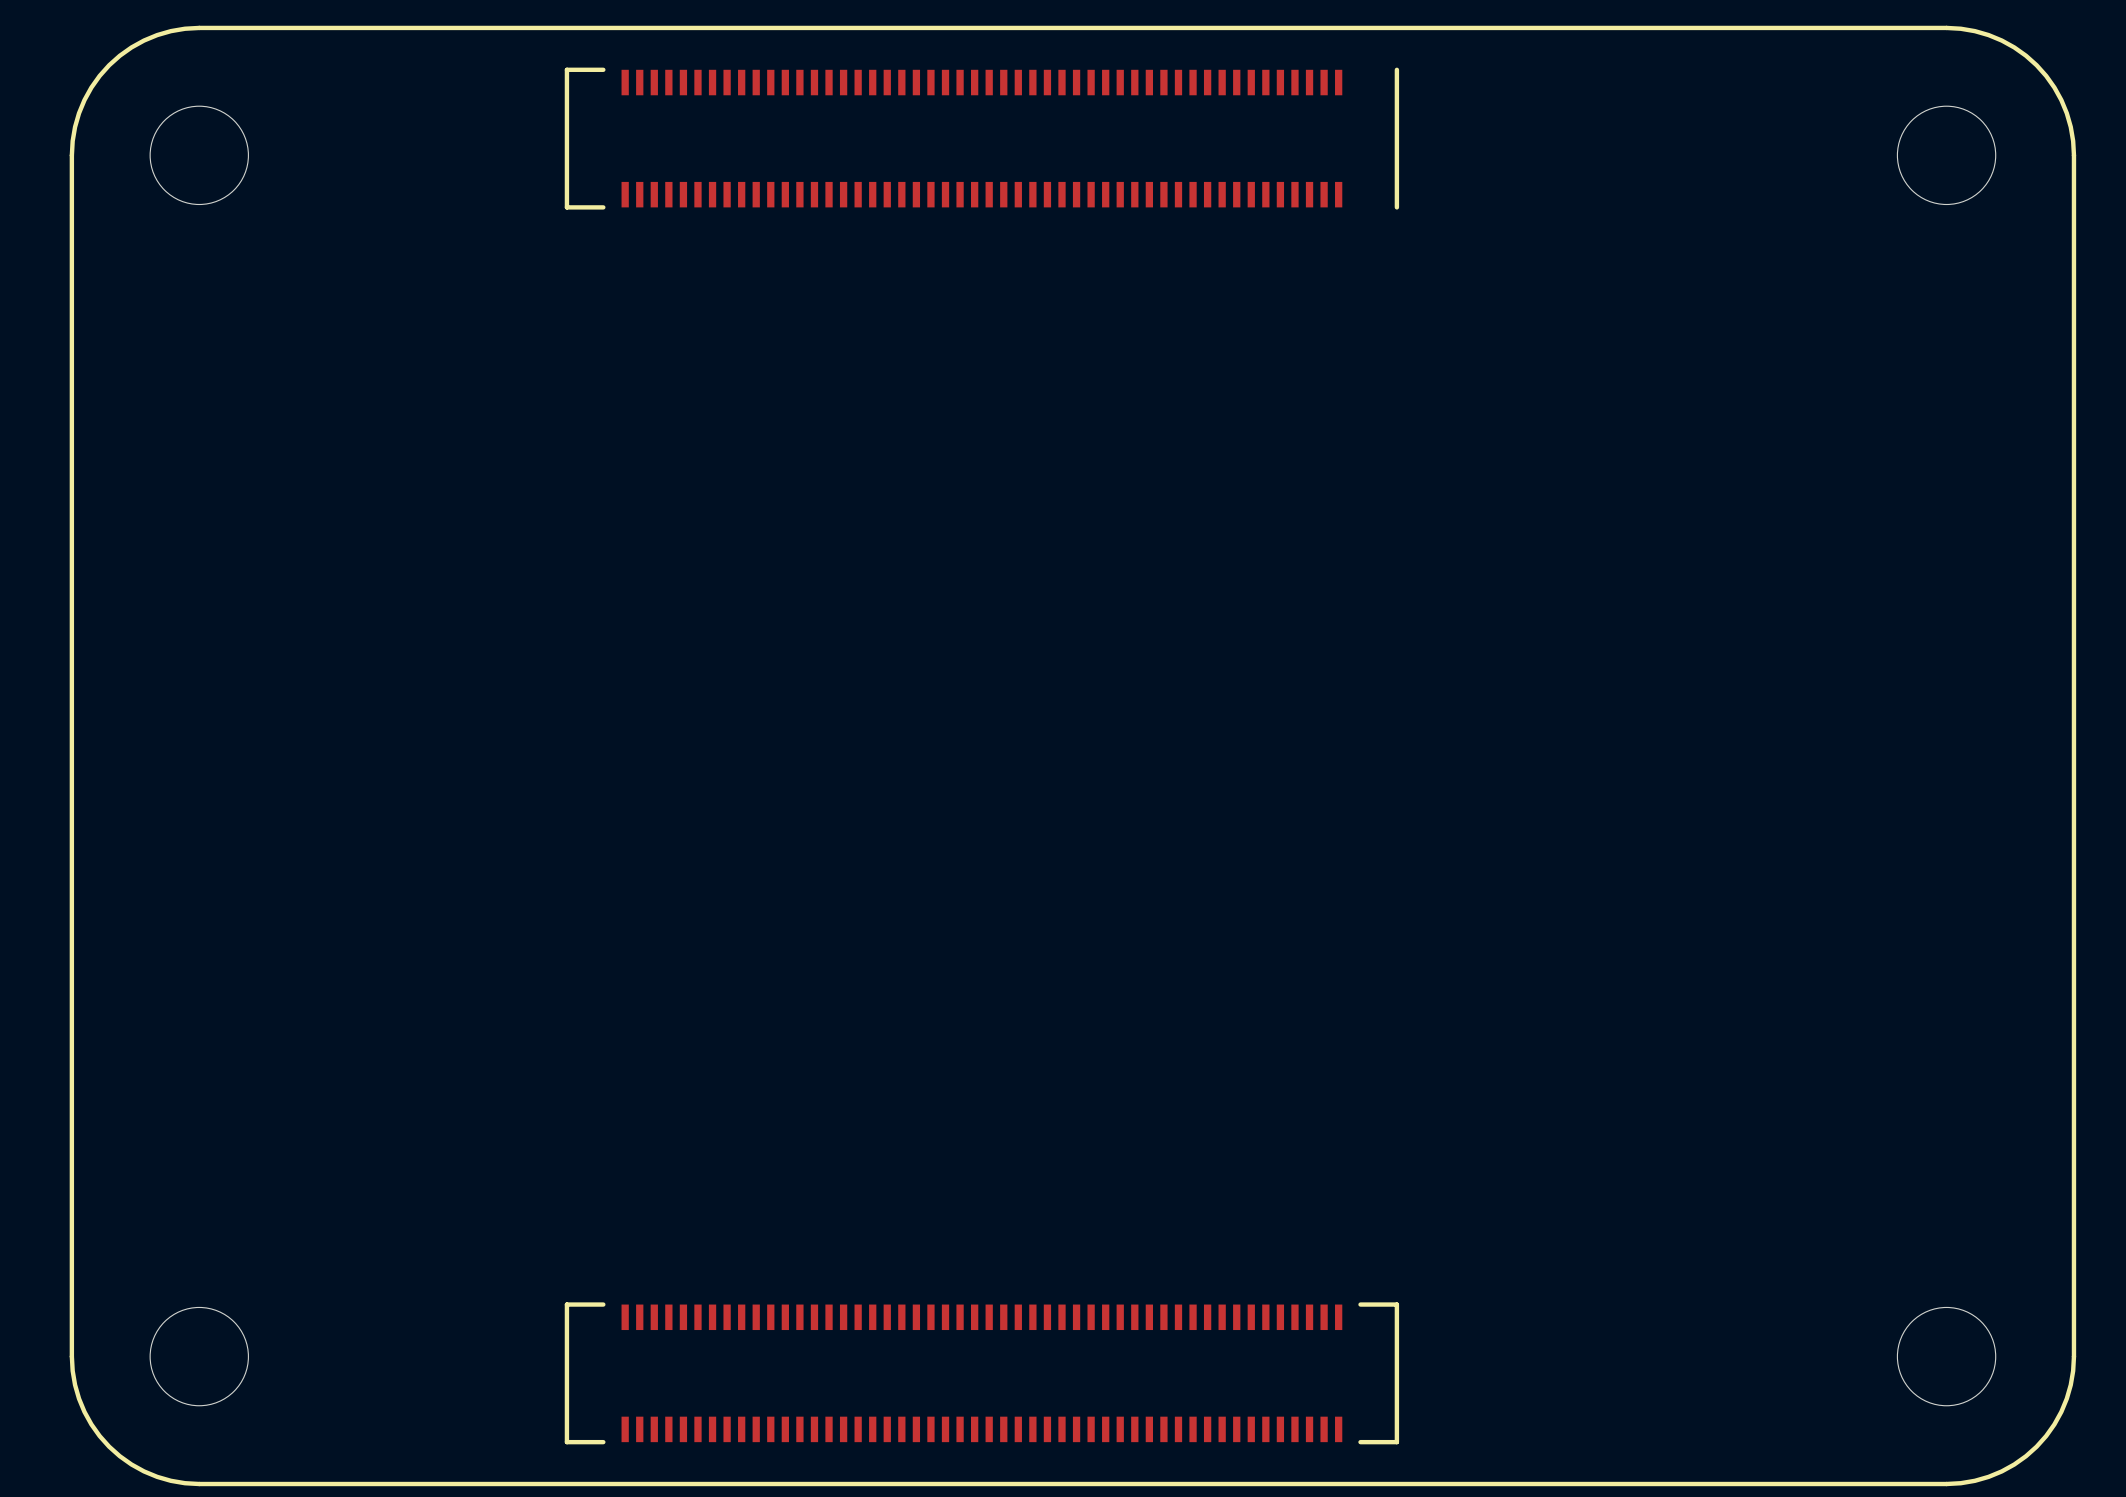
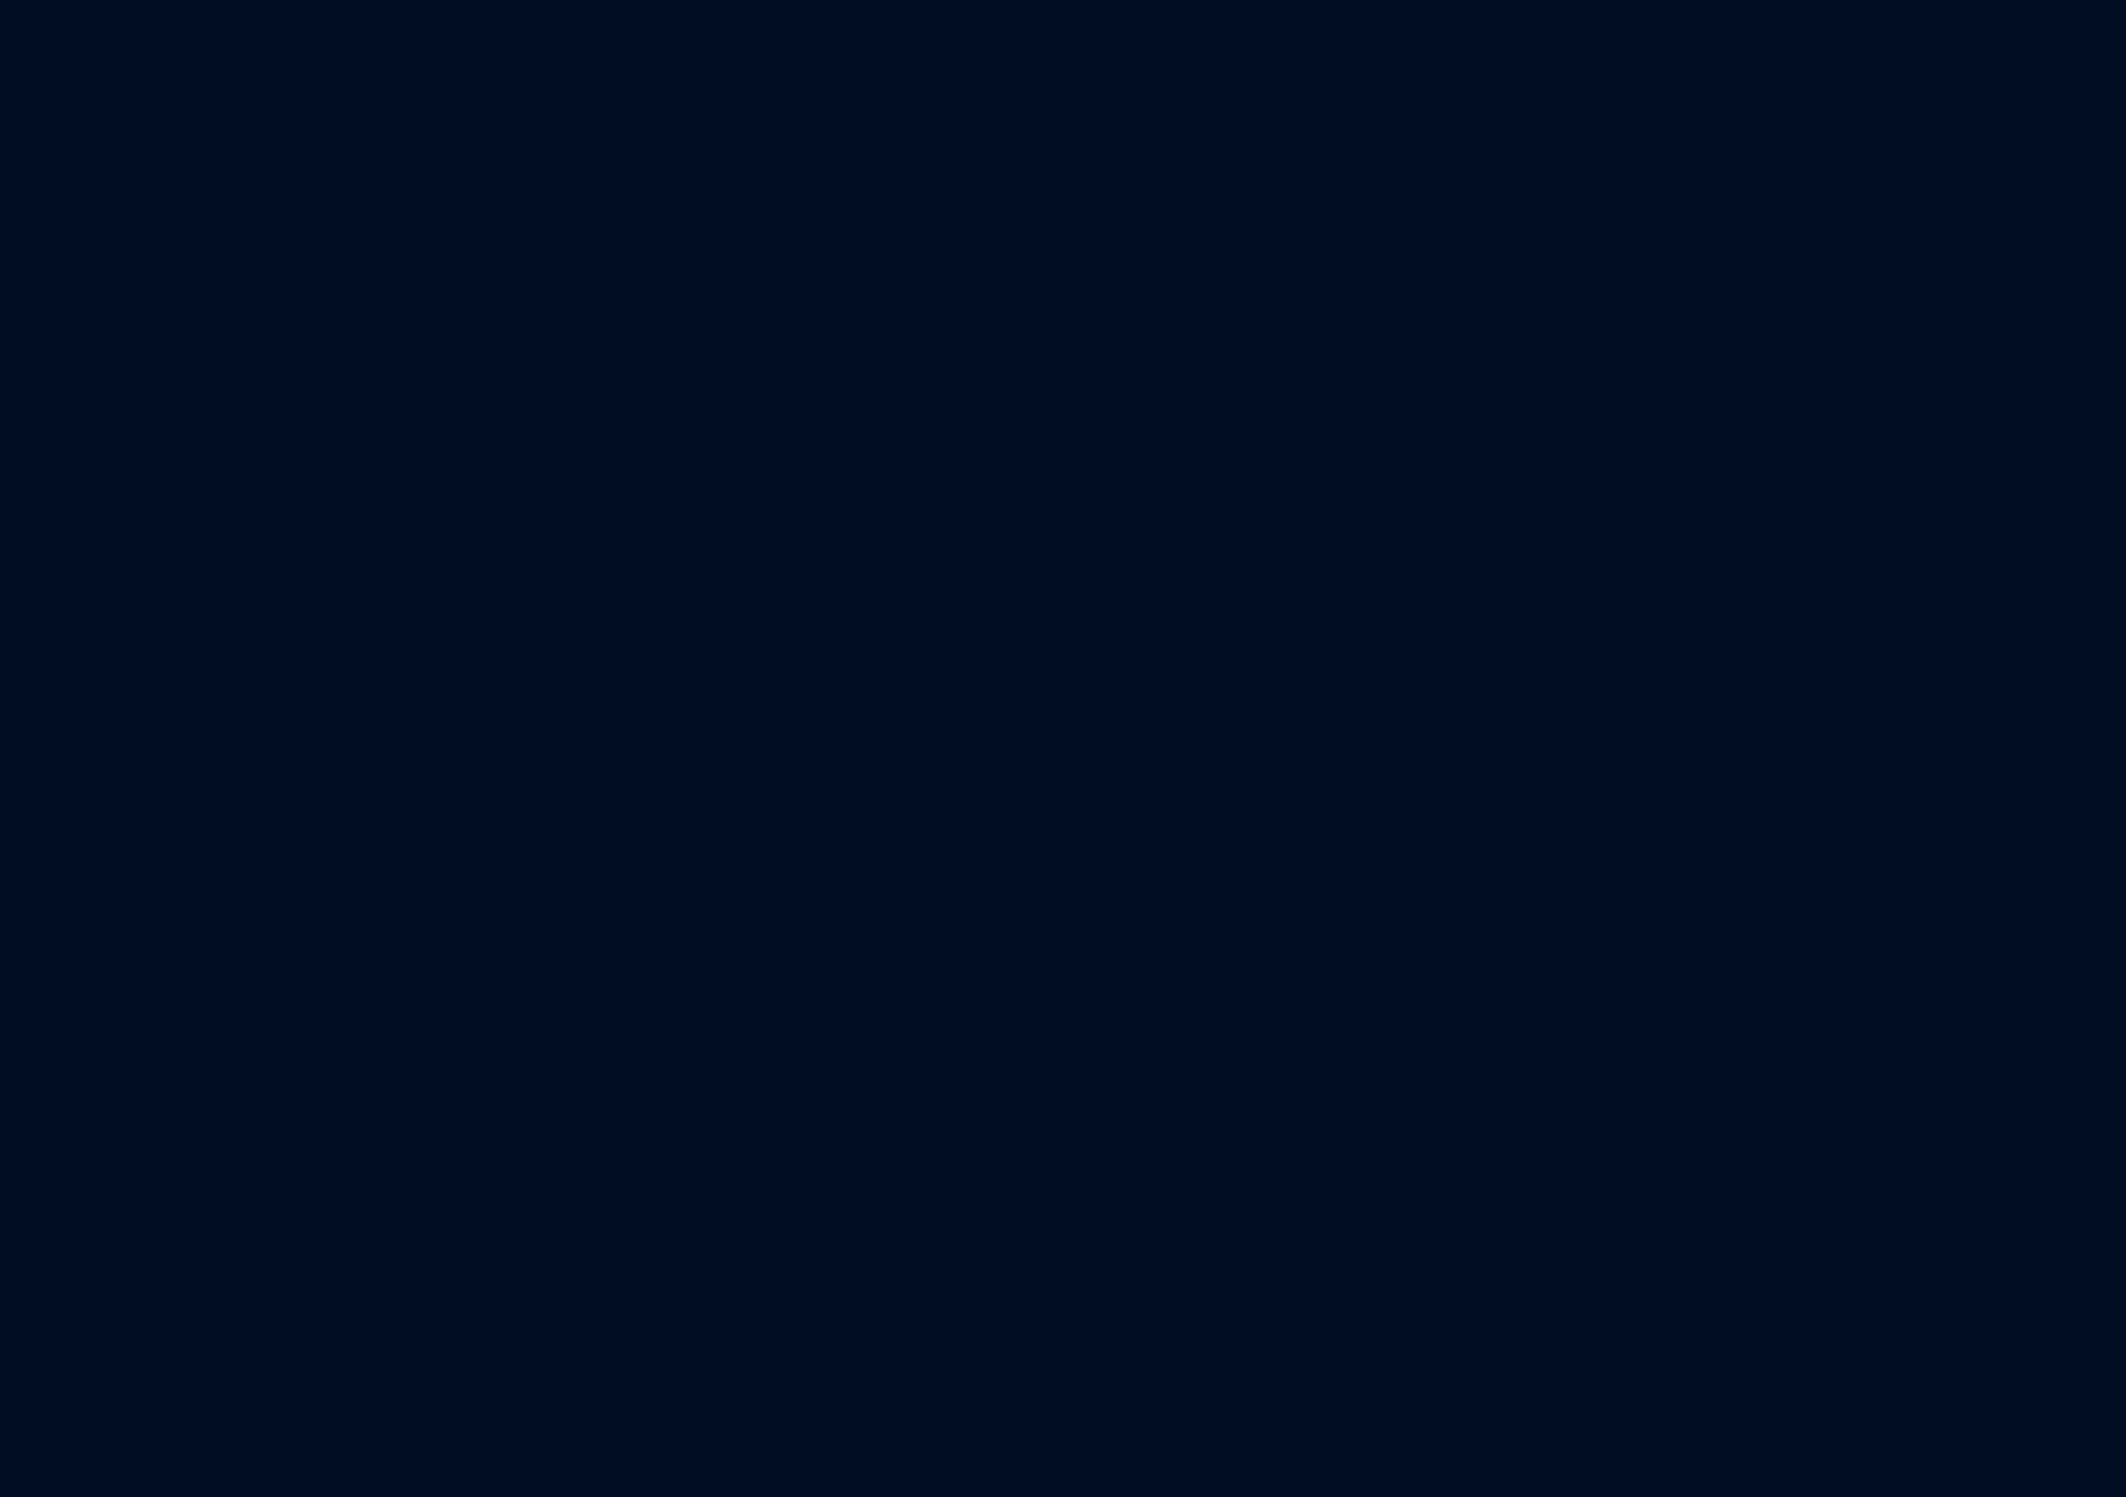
part: (1072, 755) -> none

